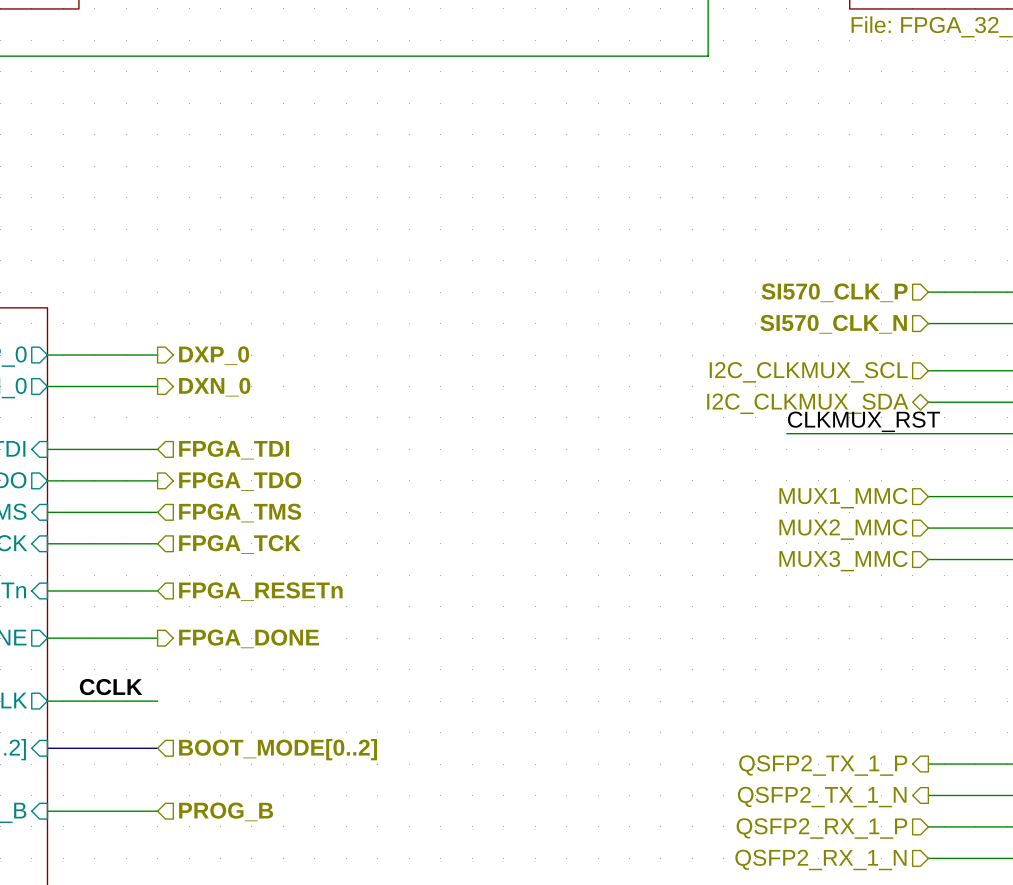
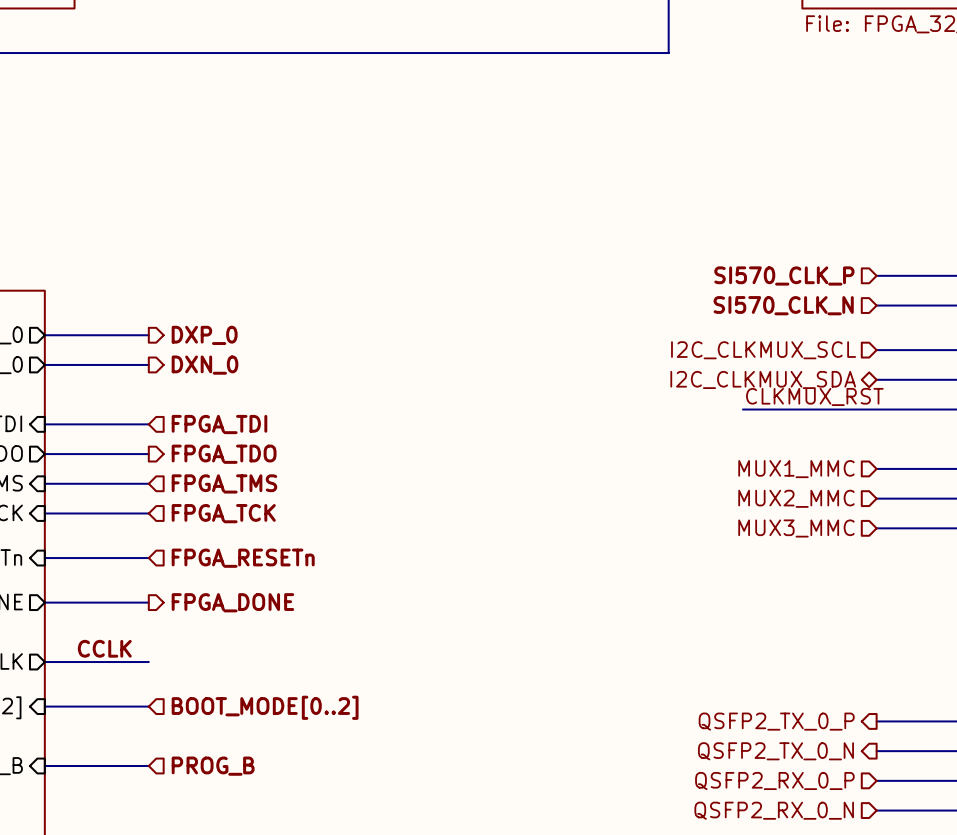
hierarchical label: QSFP2_TX_1_P (823, 765) -> QSFP2_TX_0_P (776, 721)
hierarchical label: QSFP2_TX_1_N (822, 797) -> QSFP2_TX_0_N (775, 751)
hierarchical label: QSFP2_RX_1_P (821, 828) -> QSFP2_RX_0_P (774, 781)
hierarchical label: QSFP2_RX_1_N (820, 859) -> QSFP2_RX_0_N (774, 810)

